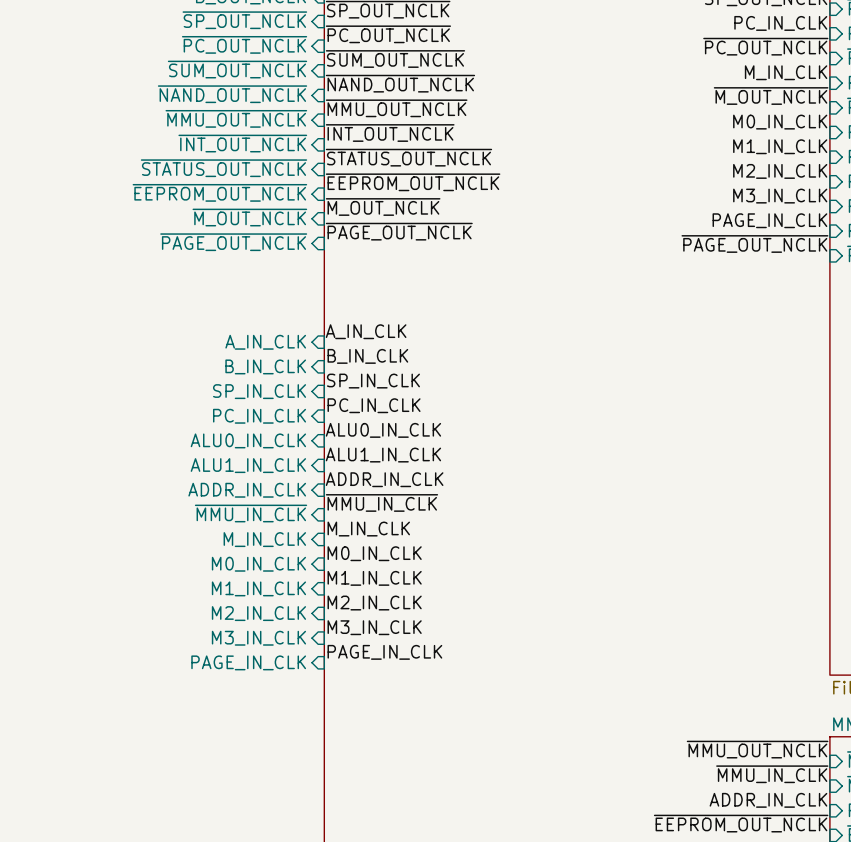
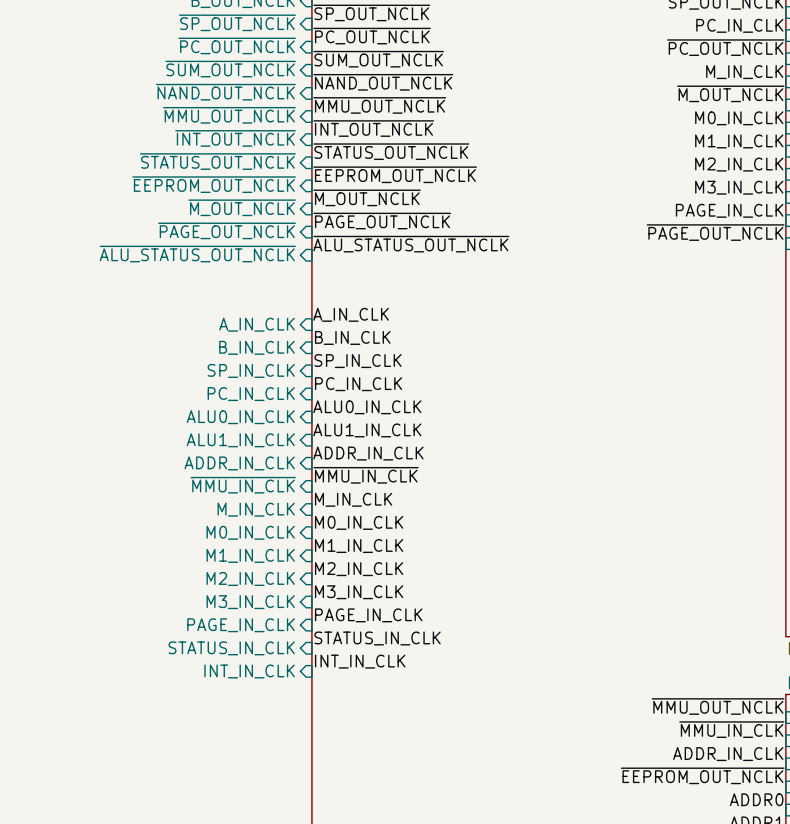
label: none -> ~{ALU_STATUS_OUT_NCLK} (411, 244)
sheet pin: none -> ~{ALU_STATUS_OUT_NCLK} (197, 254)
label: none -> STATUS_IN_CLK (377, 638)
sheet pin: none -> STATUS_IN_CLK (231, 648)
label: none -> INT_IN_CLK (360, 661)
sheet pin: none -> INT_IN_CLK (249, 671)

